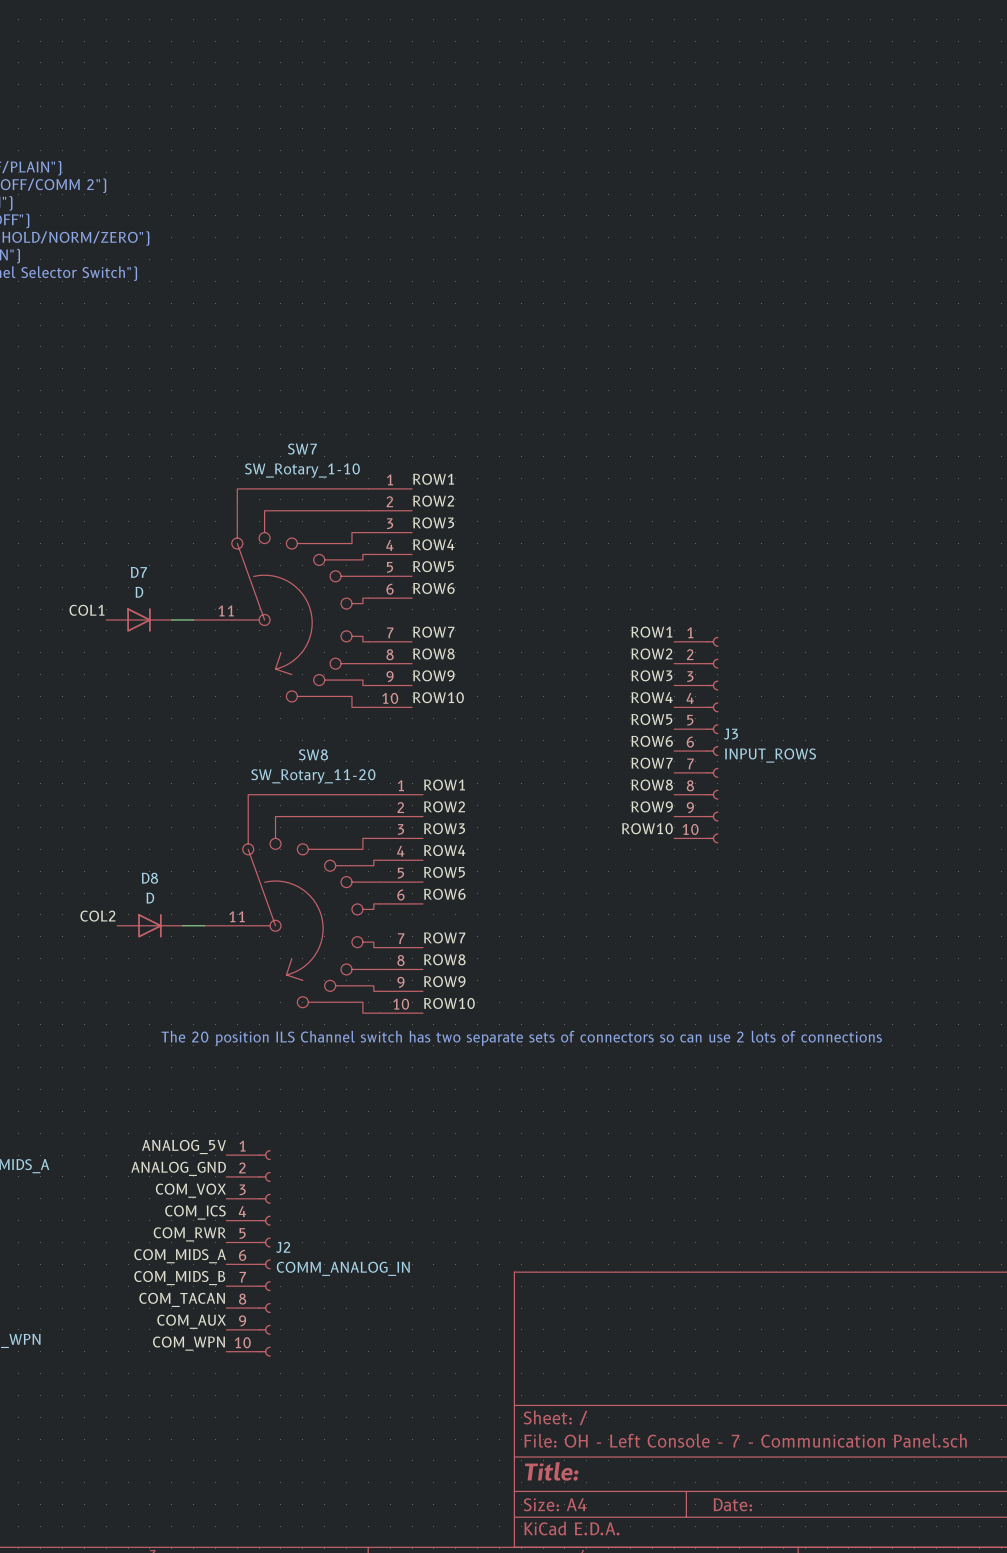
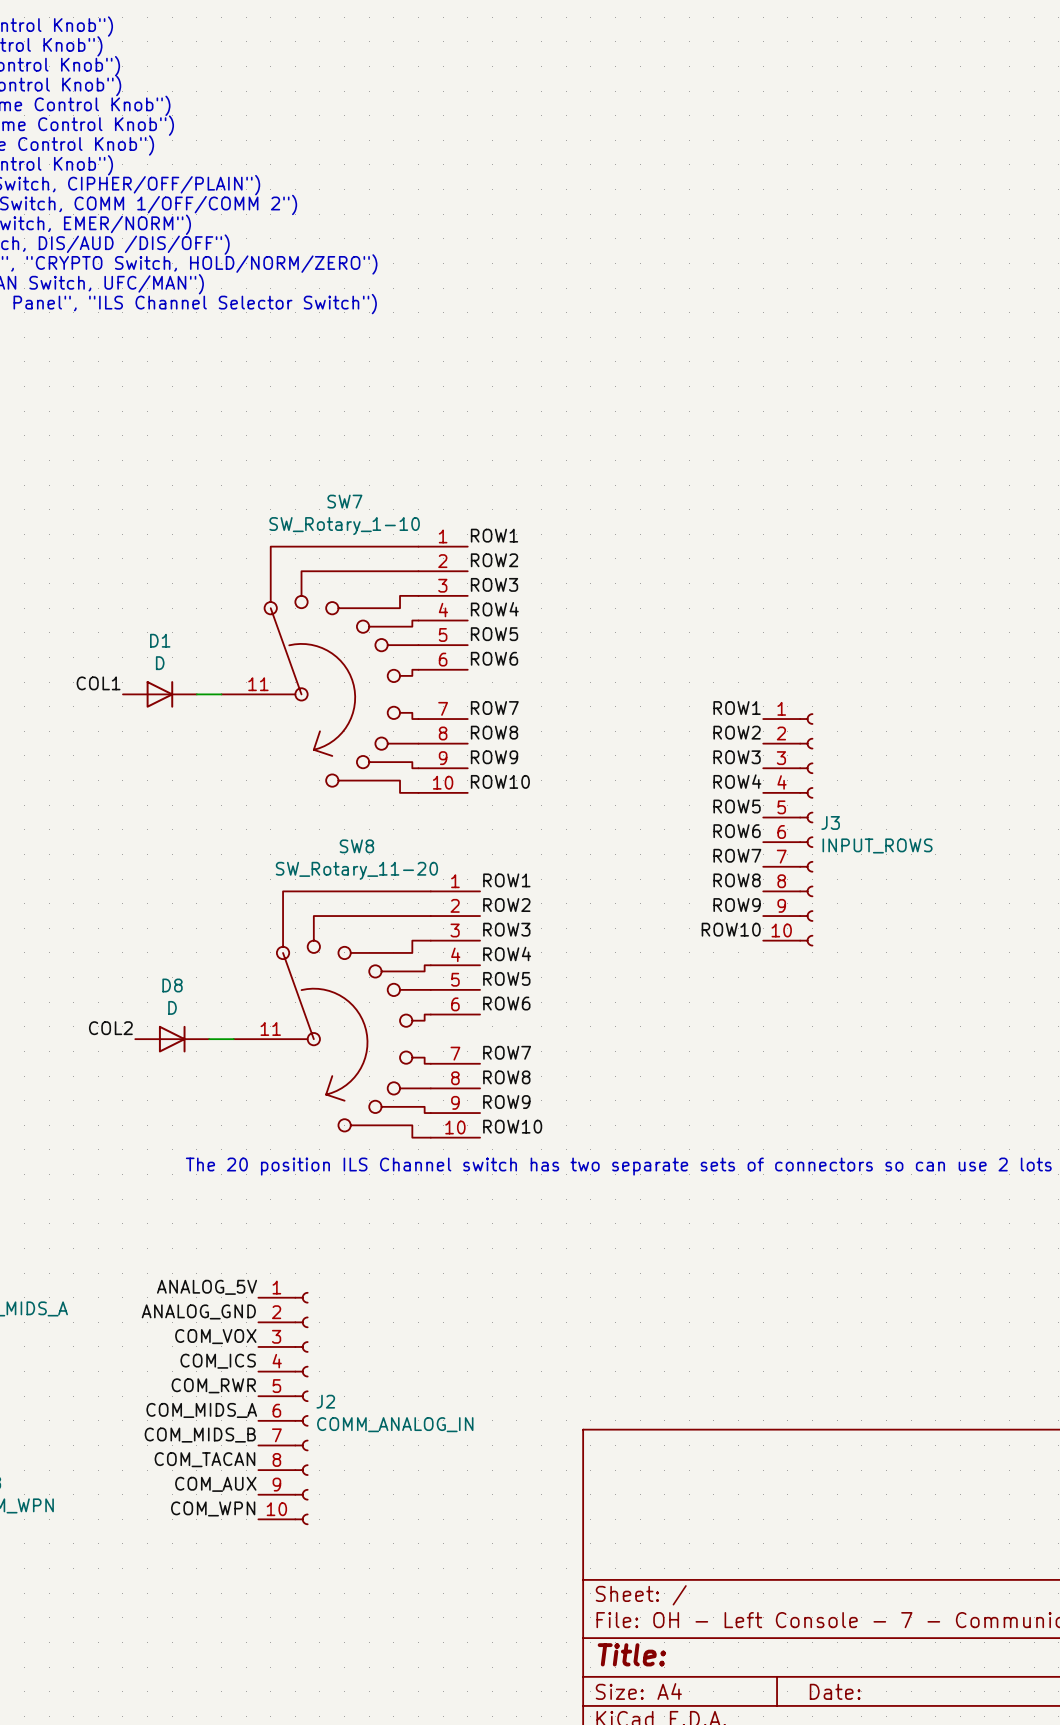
D7 name: D7 (138, 572) -> D1 (160, 640)

